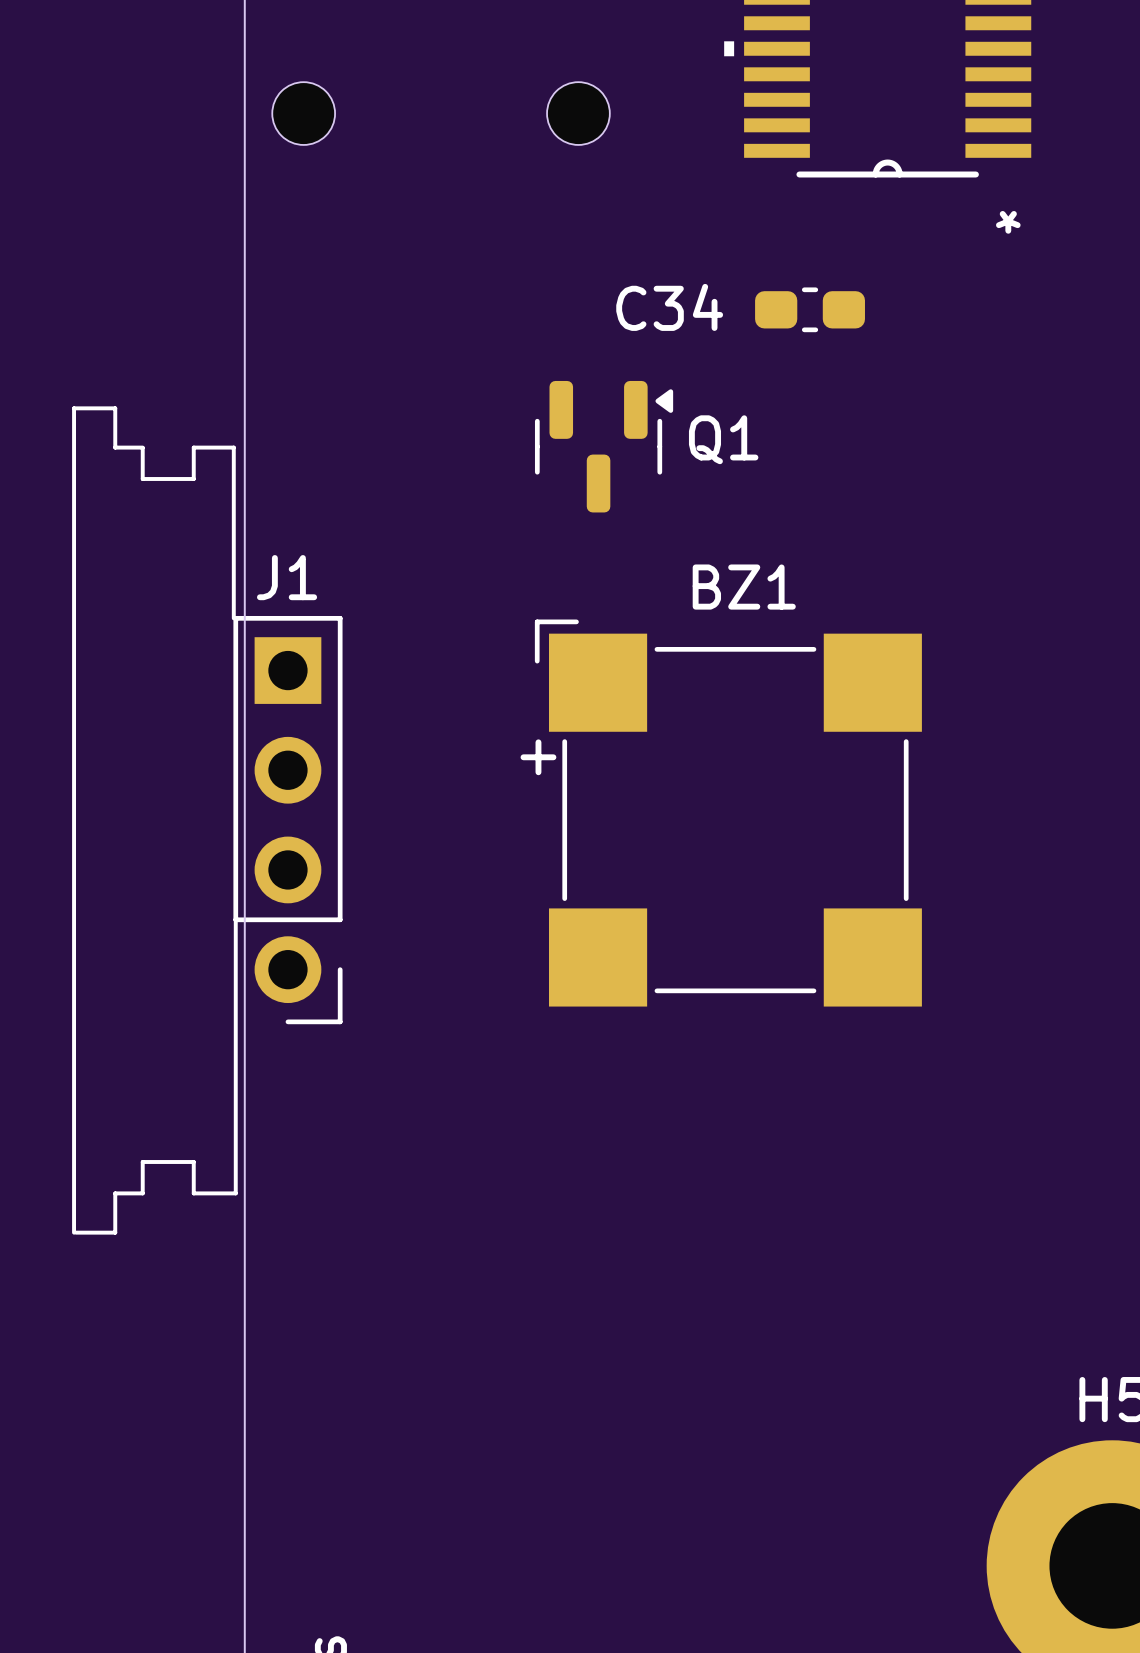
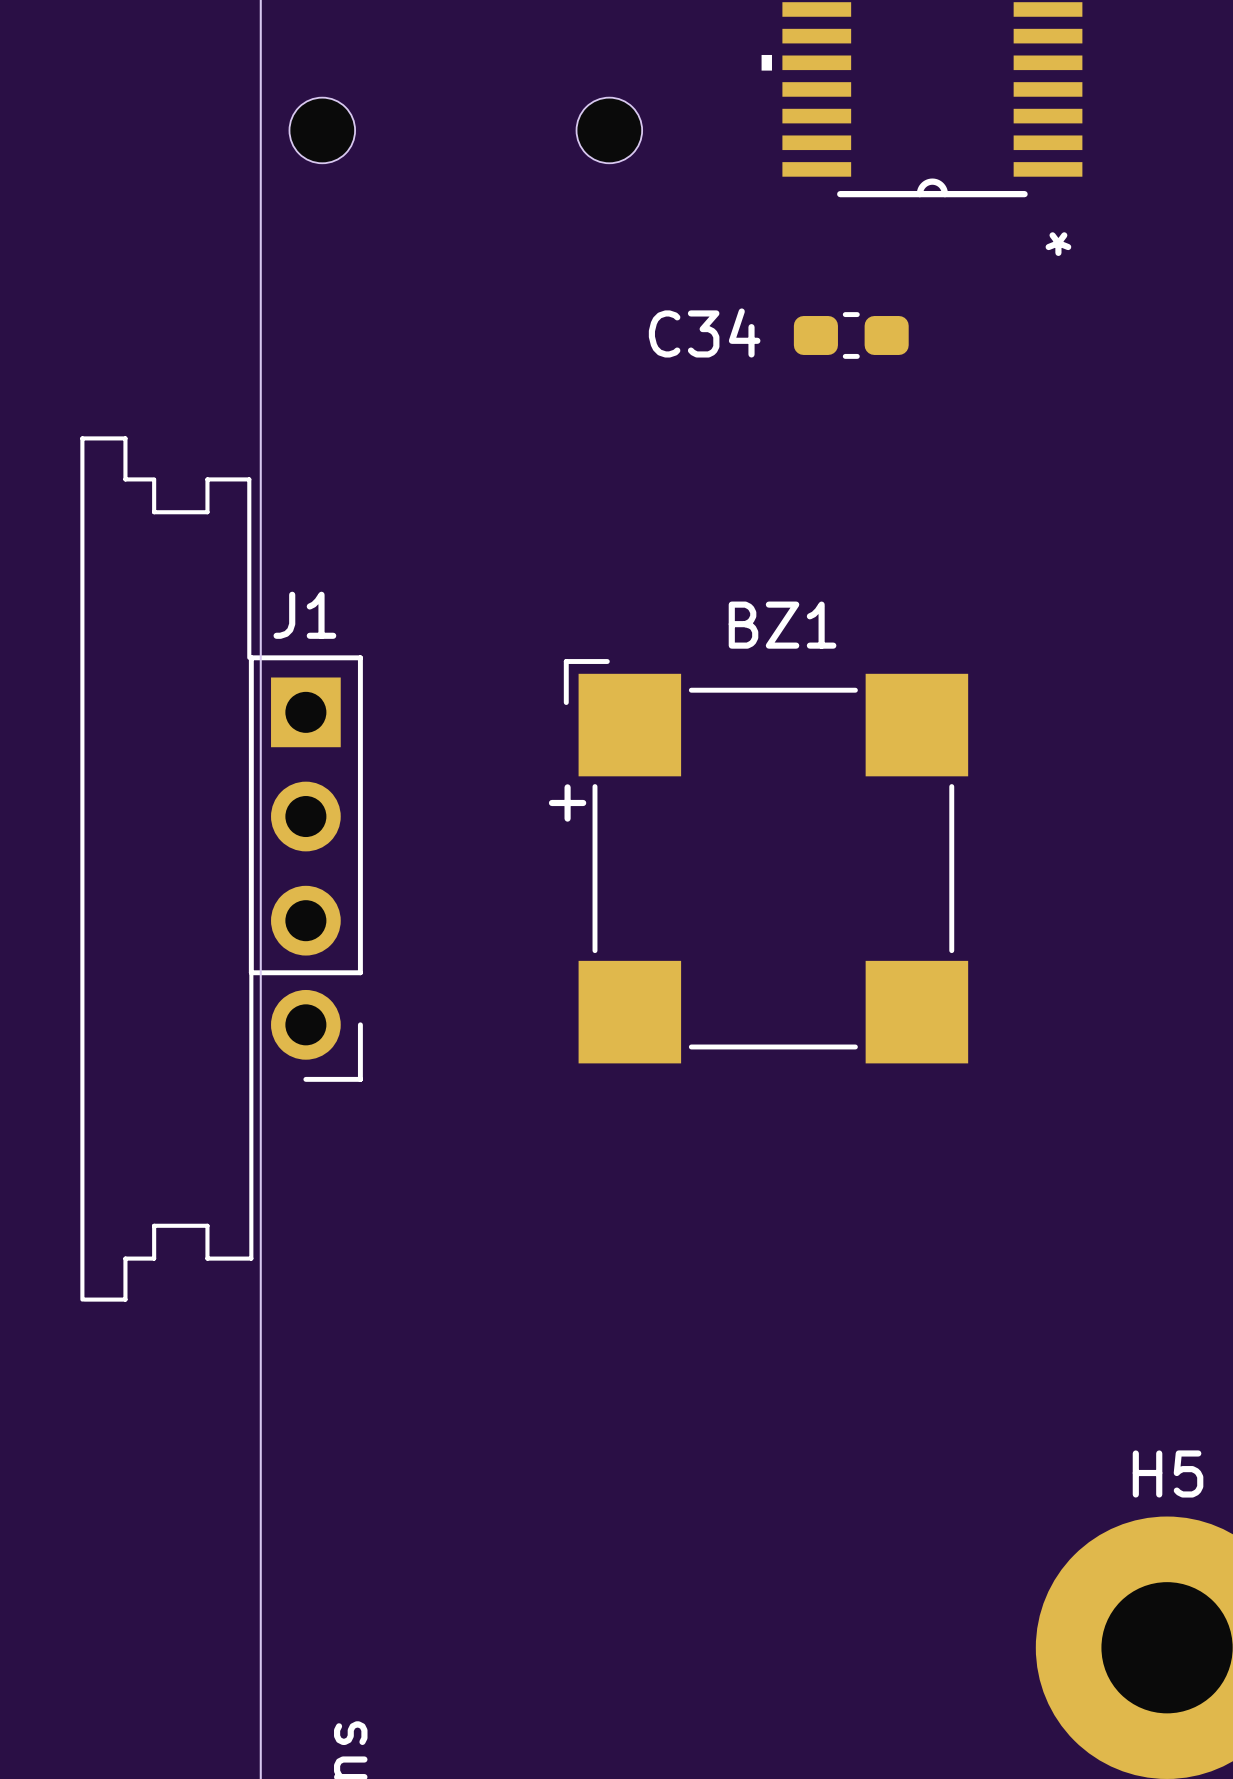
Q1: (604, 446) -> none

